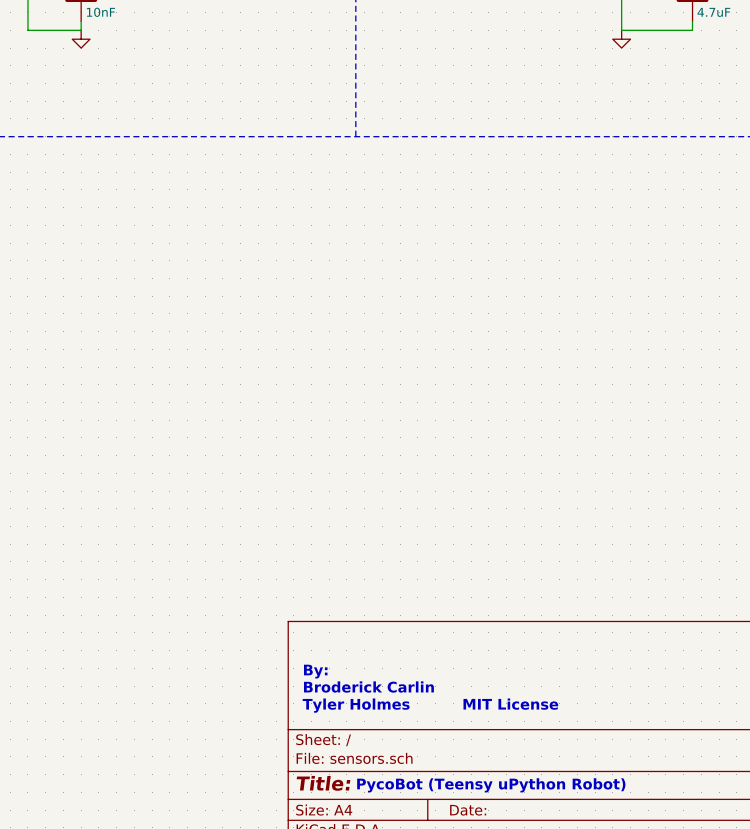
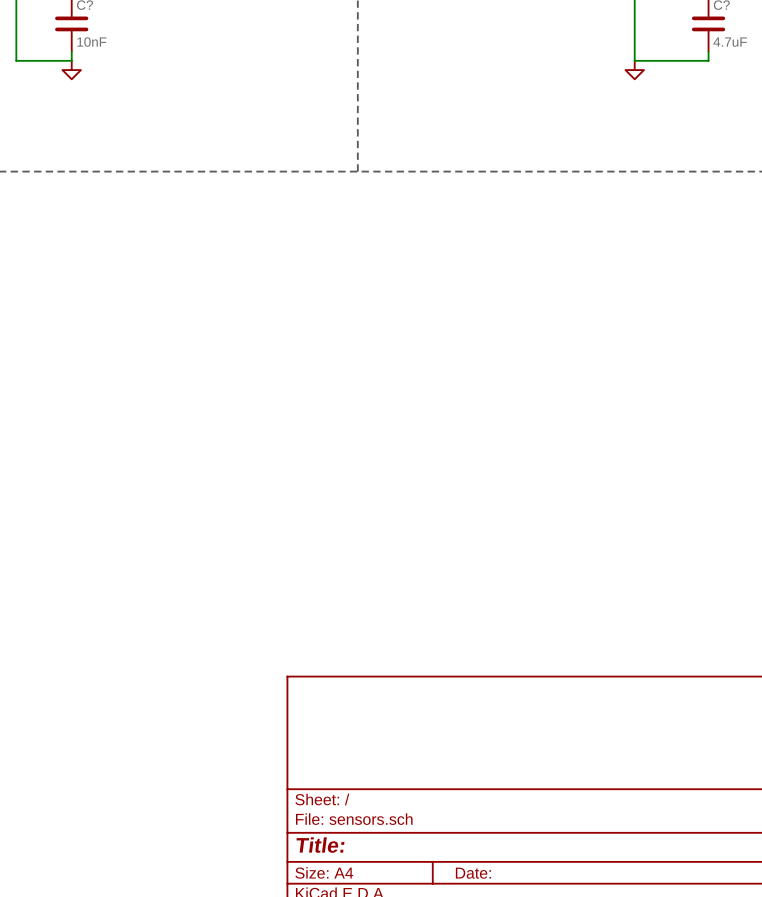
text: By: (315, 671) -> none
text: Broderick Carlin (368, 687) -> none
text: MIT License (510, 704) -> none
text: Tyler Holmes (356, 705) -> none
text: PycoBot (Teensy uPython Robot) (491, 785) -> none

